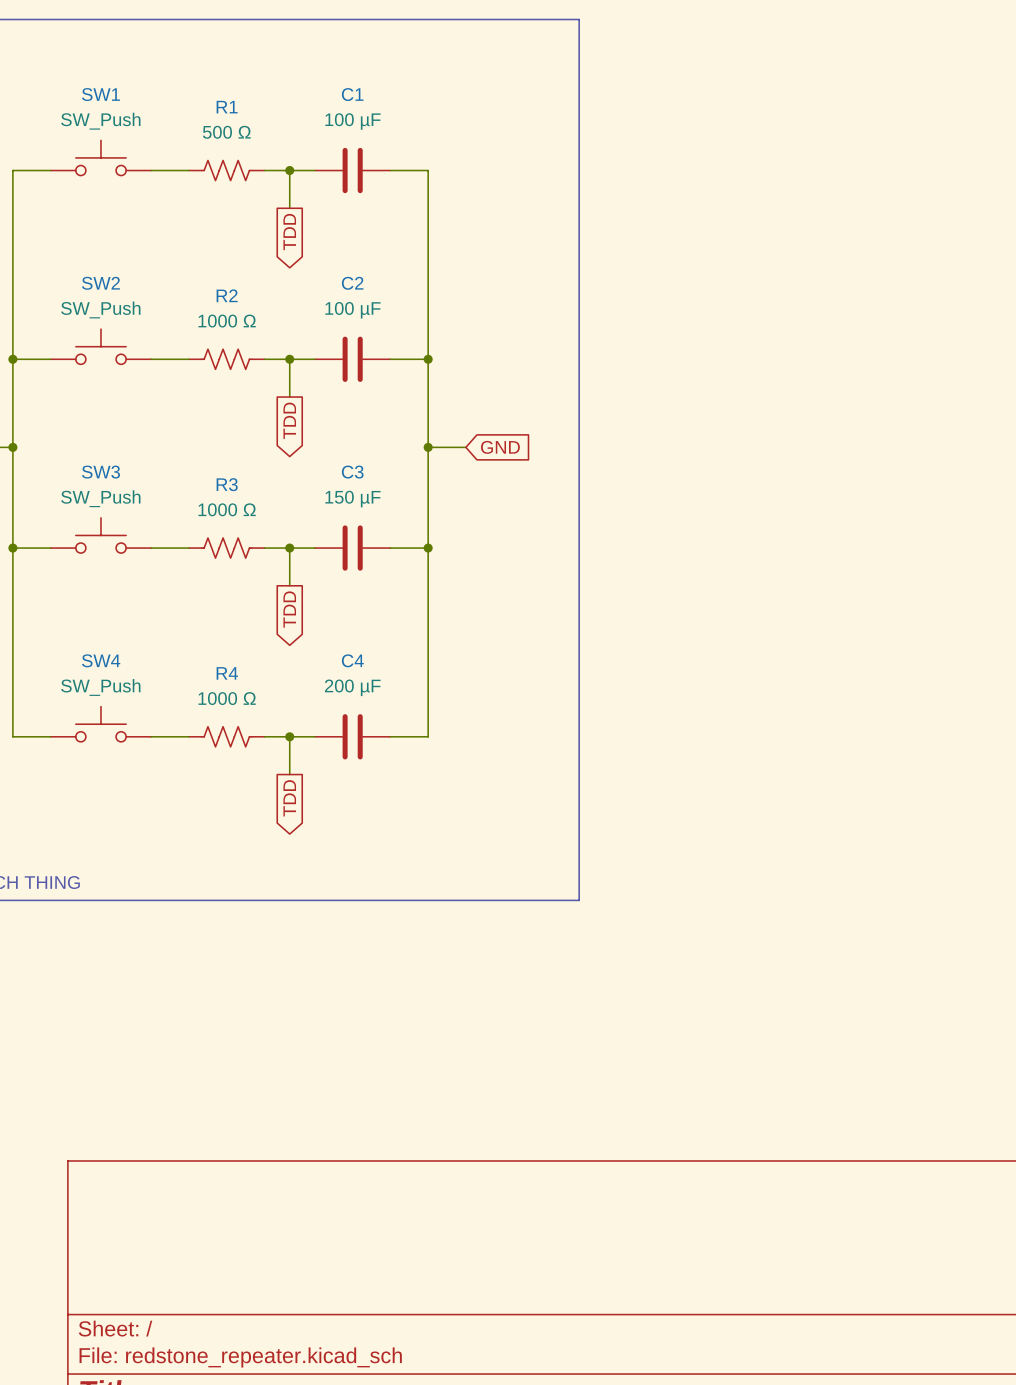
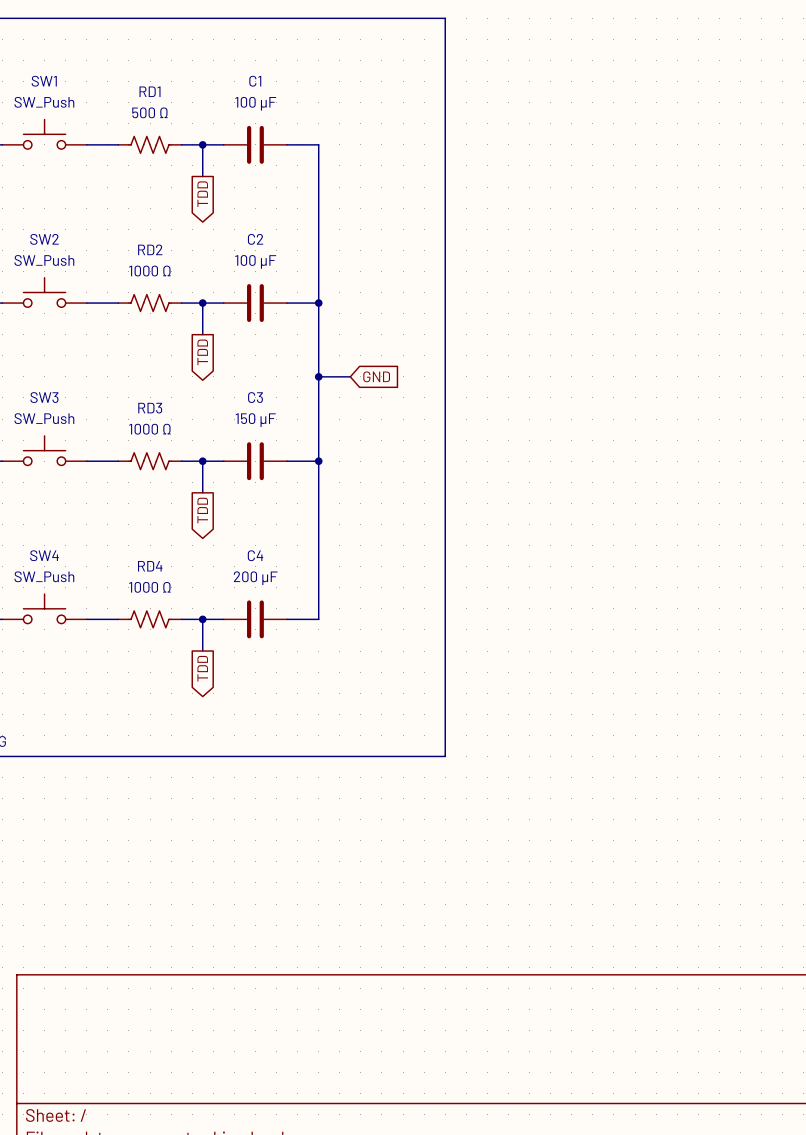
R1 name: R1 (227, 107) -> RD1 (150, 91)
R2 name: R2 (227, 295) -> RD2 (150, 249)
R3 name: R3 (227, 484) -> RD3 (150, 408)
R4 name: R4 (227, 673) -> RD4 (150, 566)

